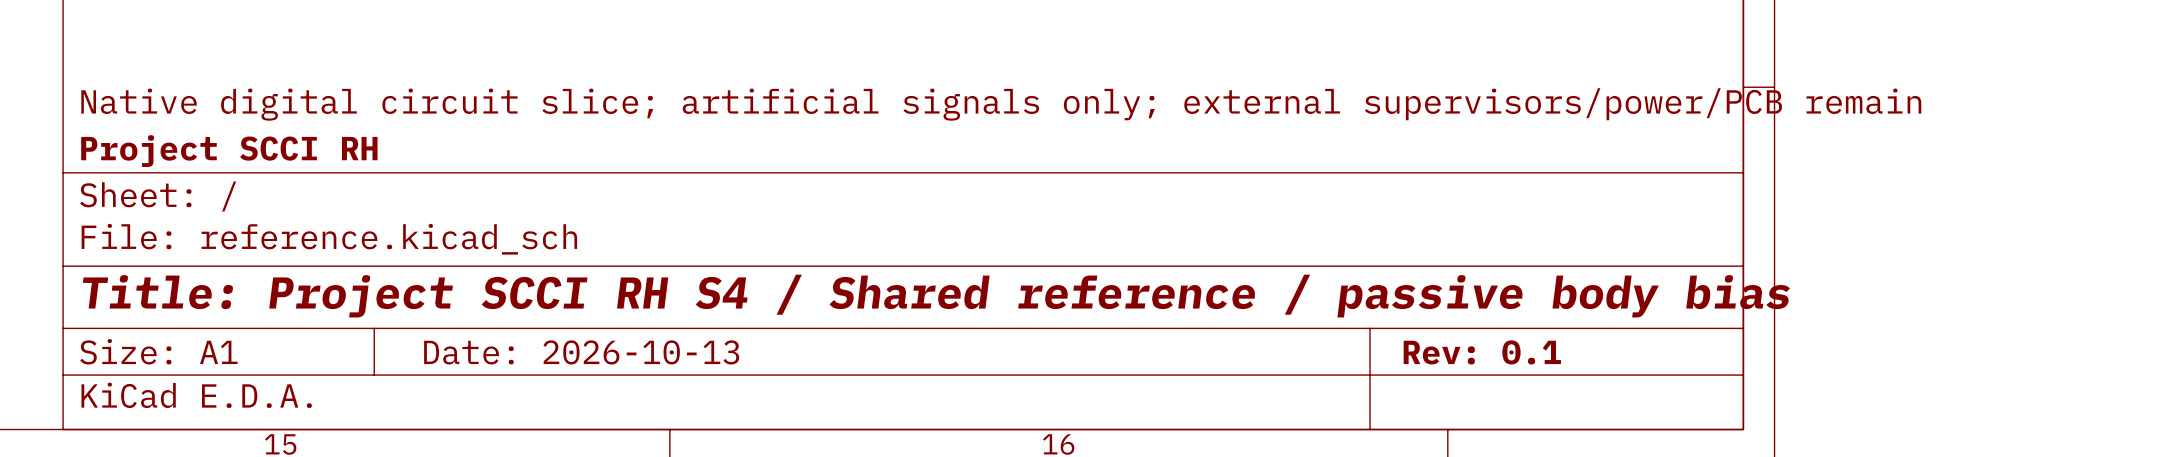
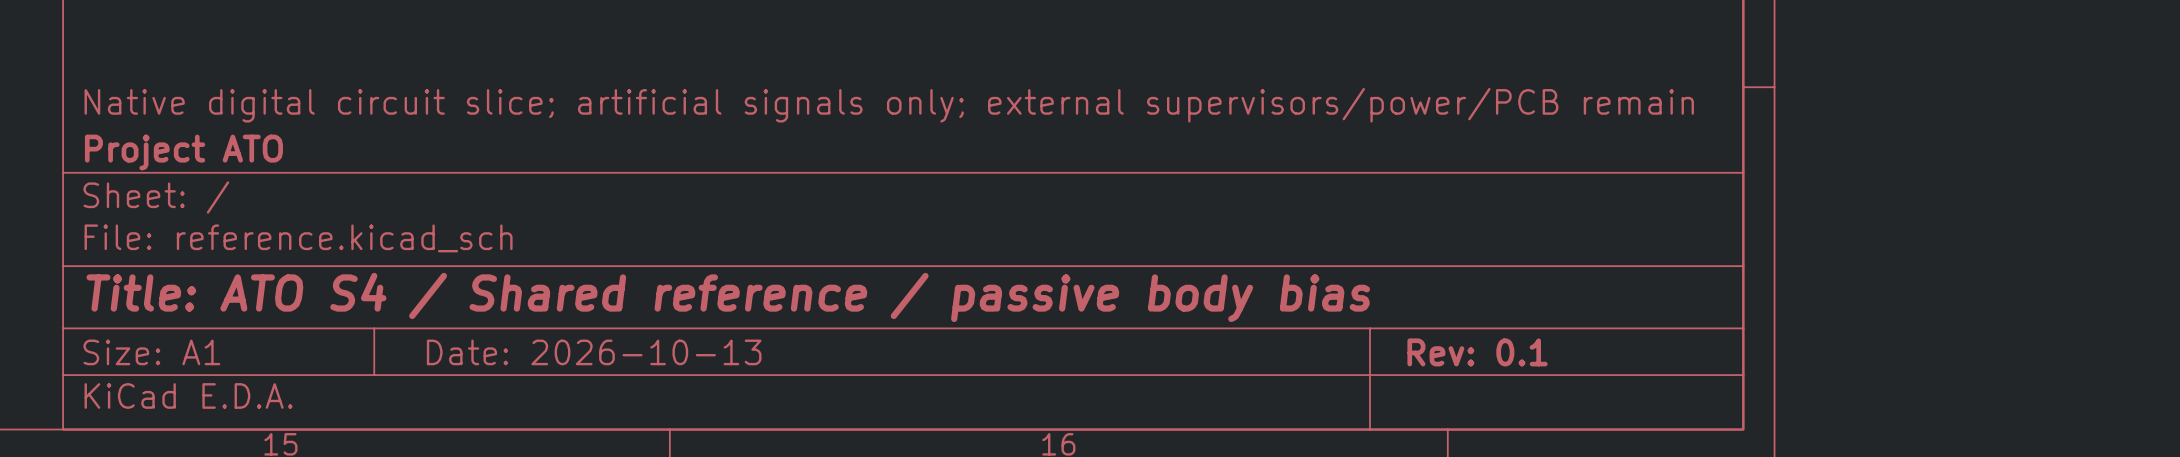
title block: Project SCCI RH (229, 151) -> Project ATO (183, 152)
title block: Title: Project SCCI RH S4 / Shared reference / passive body bias (936, 296) -> Title: ATO S4 / Shared reference / passive body bias (728, 297)

